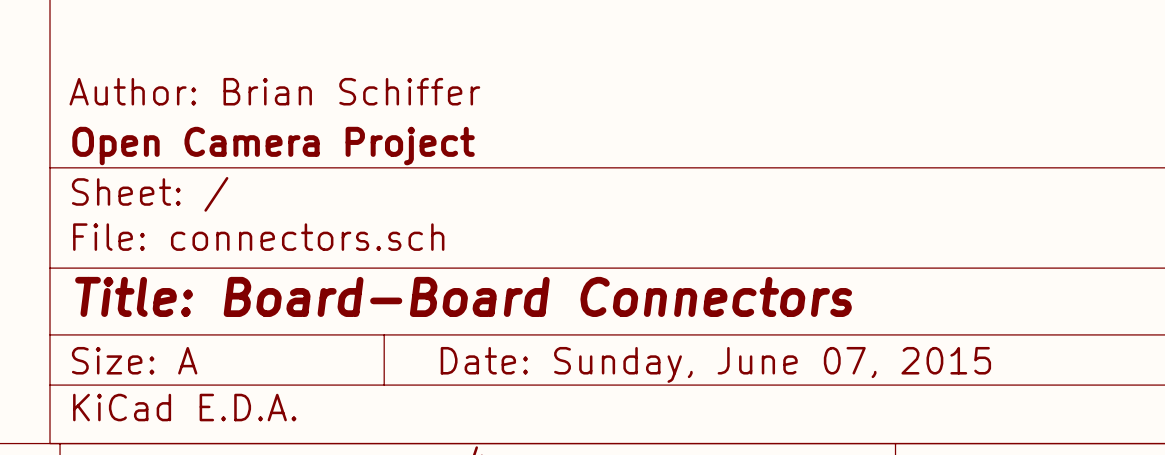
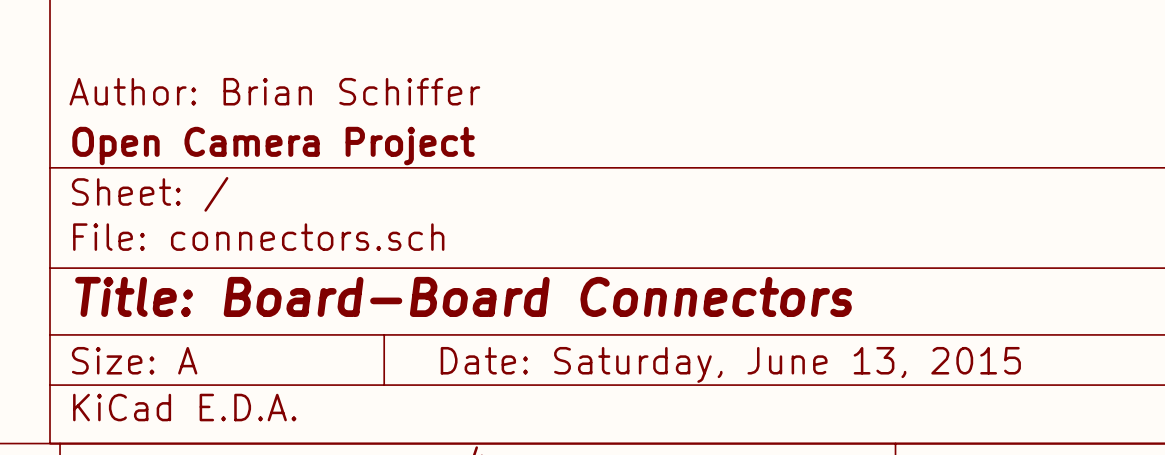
title block: Date: Sunday, June 07, 2015 (715, 364) -> Date: Saturday, June 13, 2015 (730, 364)

